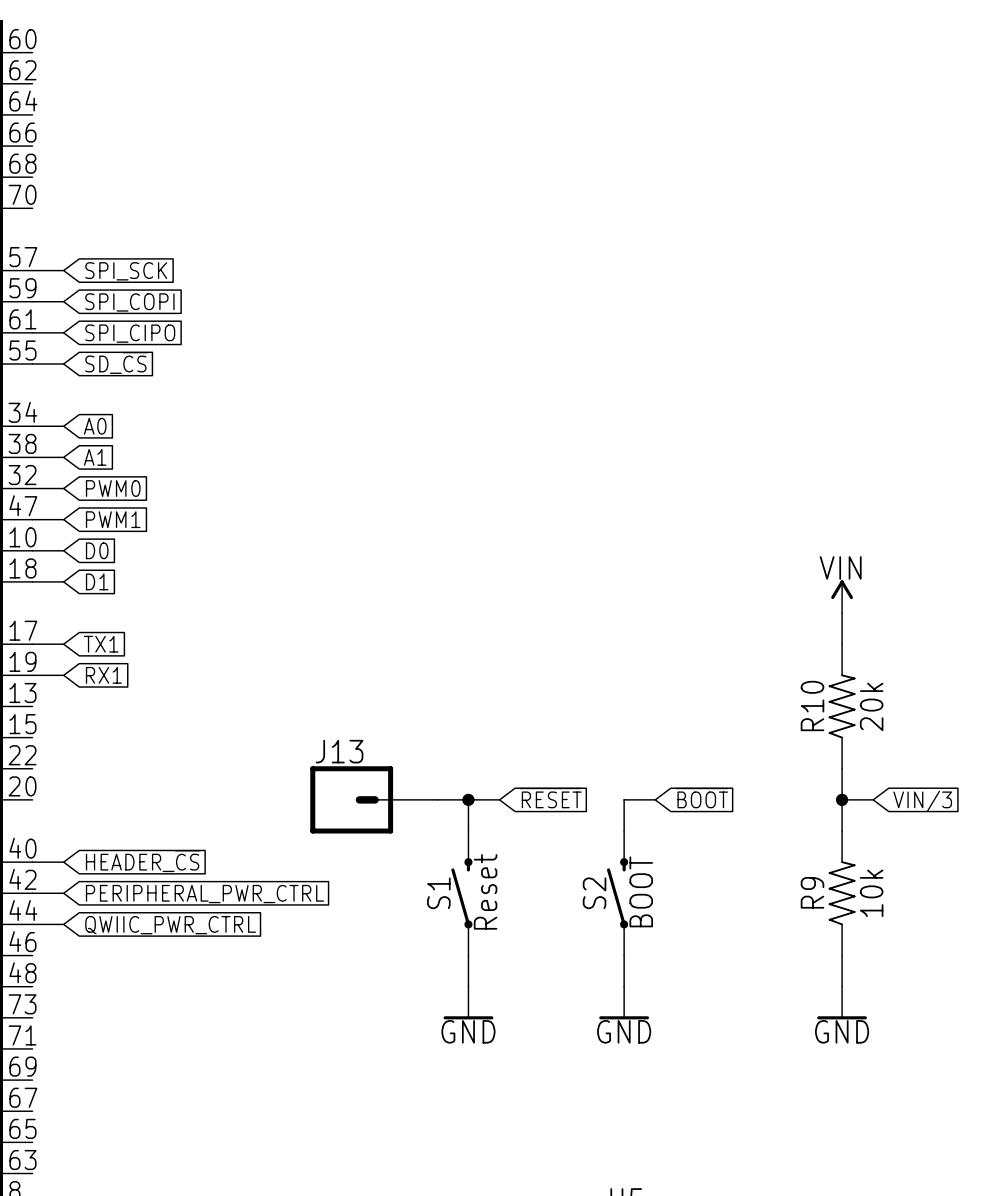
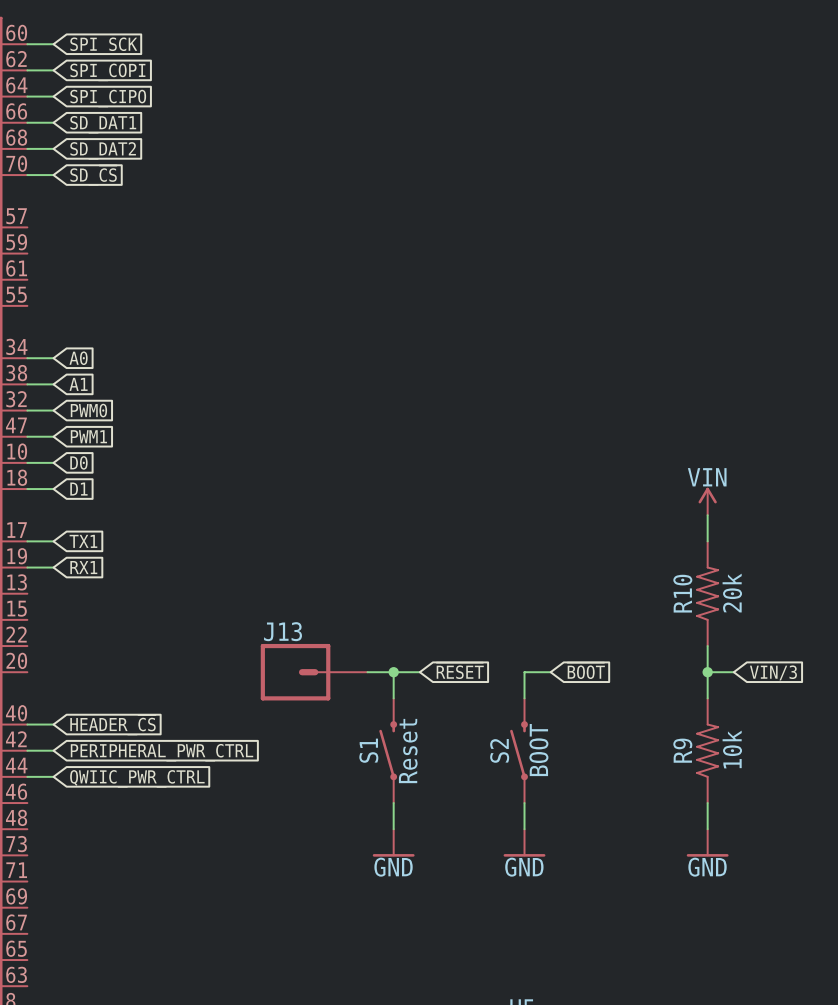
wire: none -> (27, 44) (53, 44)
wire: none -> (27, 70) (53, 70)
global label: none -> SD_DAT1 (103, 124)
global label: none -> SD_DAT2 (103, 150)
wire: (32, 270) (63, 270) -> (27, 175) (53, 175)
global label position: SPI_SCK (126, 271) -> SPI_SCK (103, 46)
wire: (32, 301) (63, 301) -> (27, 148) (53, 148)
global label position: SPI_COPI (129, 302) -> SPI_COPI (107, 72)
wire: (32, 332) (63, 332) -> (27, 122) (53, 122)
global label position: SPI_CIPO (130, 333) -> SPI_CIPO (108, 98)
global label position: SD_~{CS} (116, 362) -> SD_~{CS} (93, 175)
wire: (32, 363) (63, 363) -> (27, 96) (53, 96)

